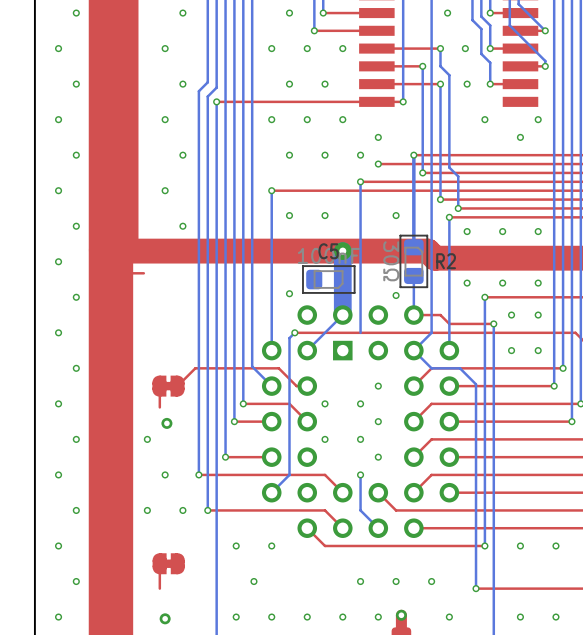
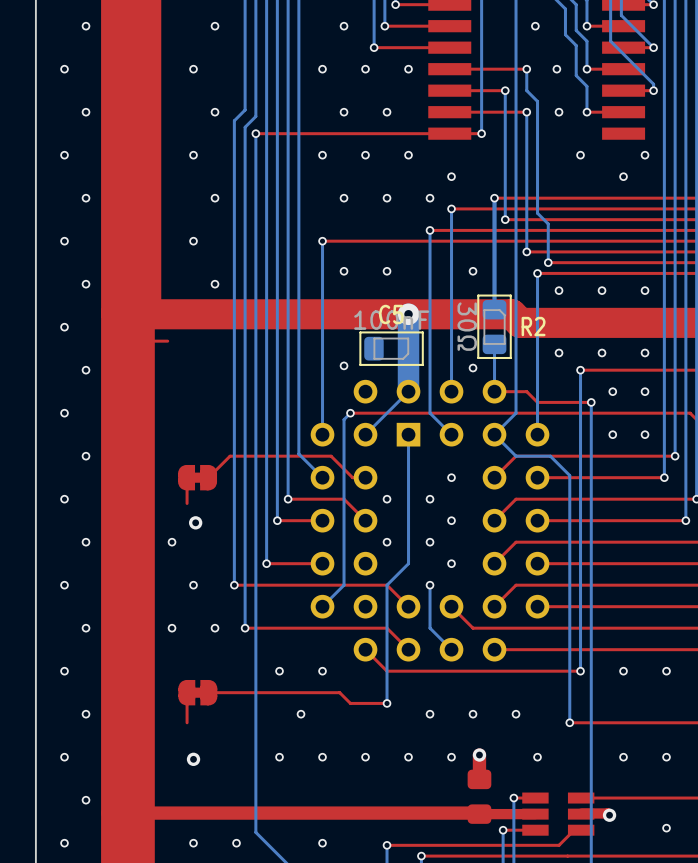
bottom track: none -> (451, 208) (451, 391)
bottom track: none -> (430, 413) (451, 434)
bottom track: none -> (408, 434) (408, 563) (387, 585) (387, 703)
top track: none -> (208, 692) (339, 692) (350, 703) (387, 703)
via: none -> (387, 703)

